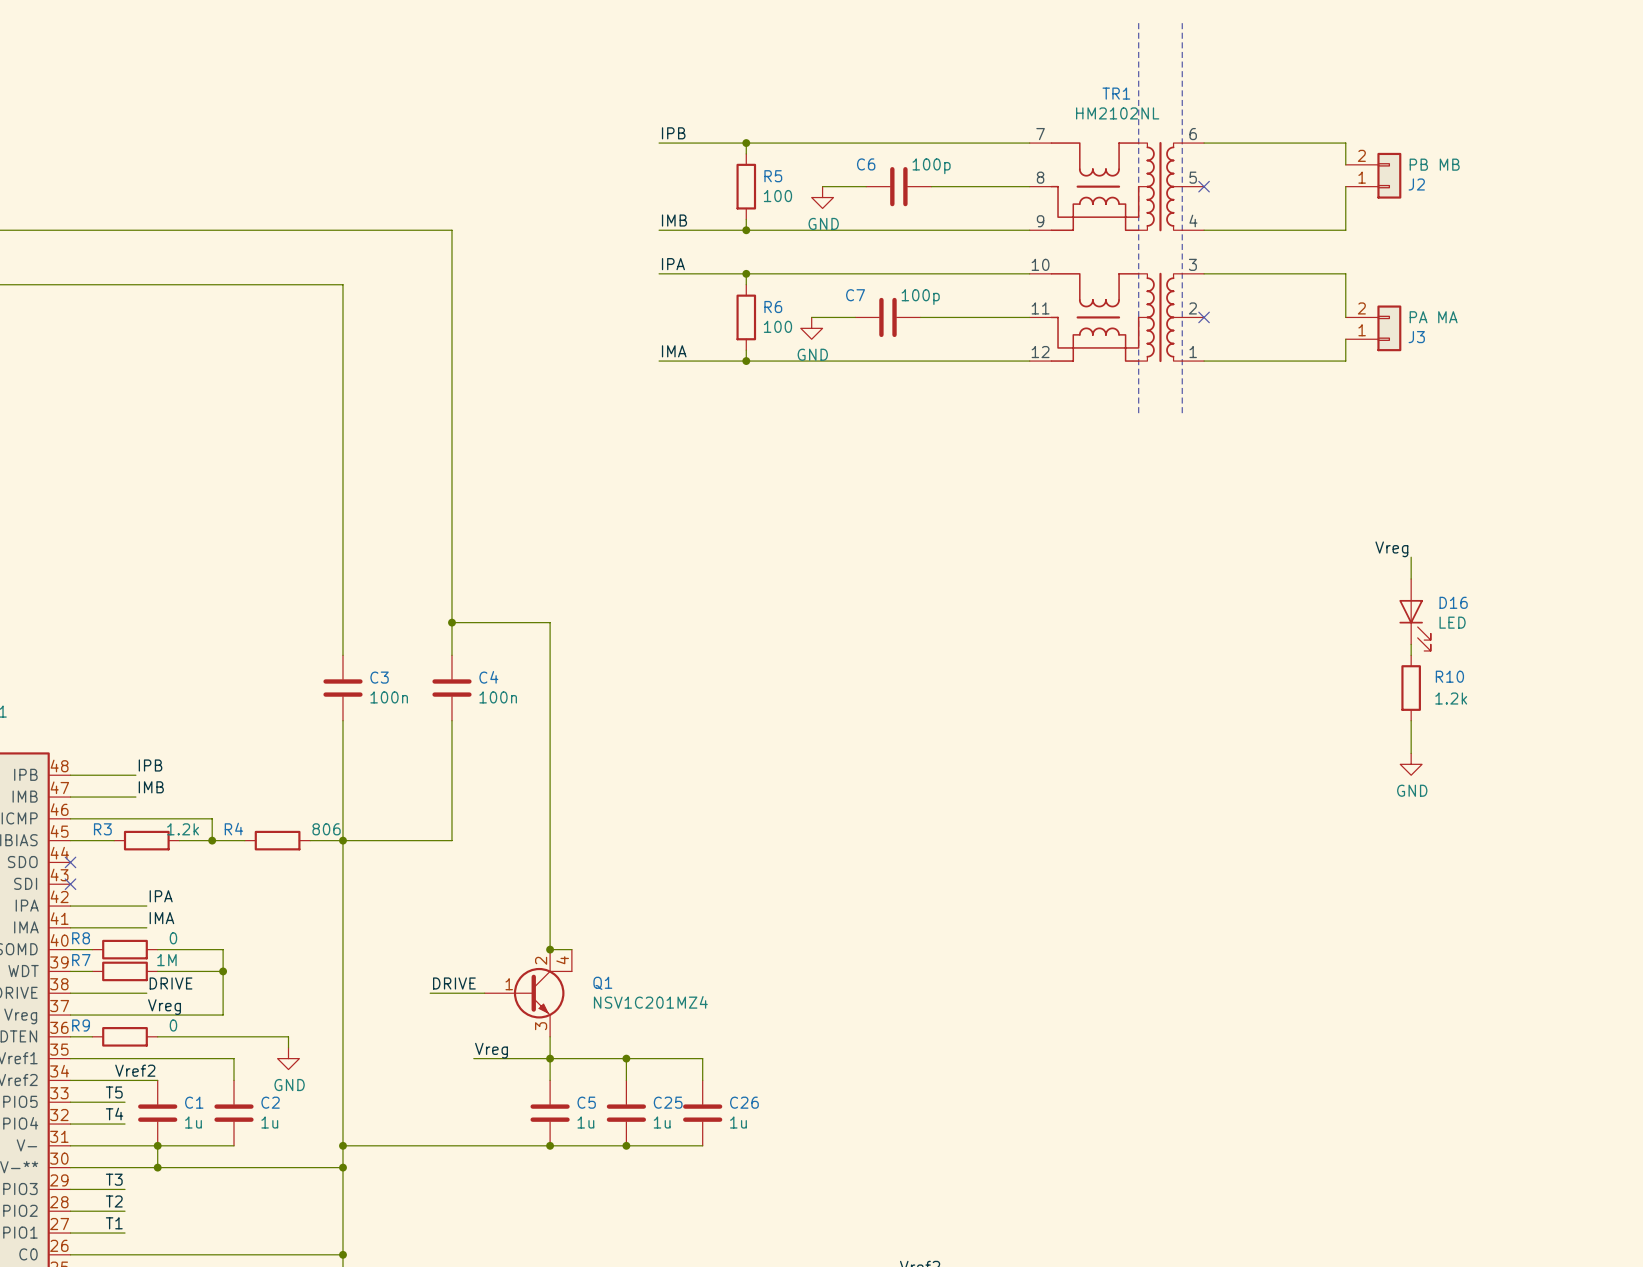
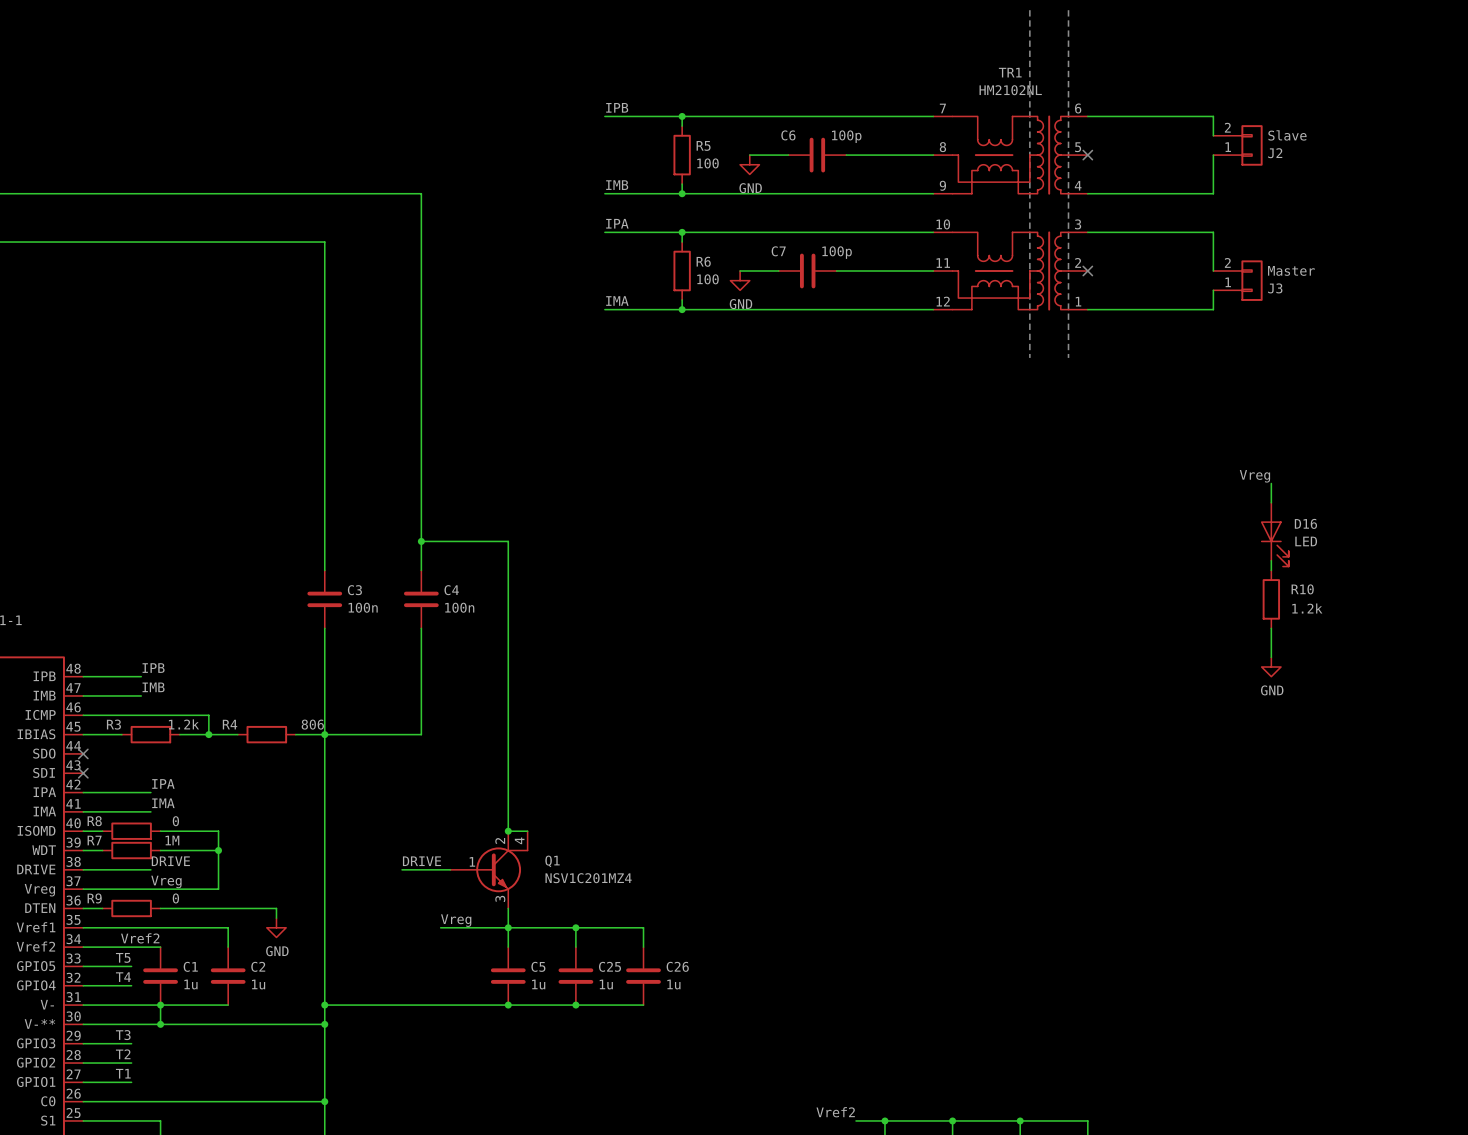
J2 value: PB MB (1434, 164) -> Slave (1287, 135)
J3 value: PA MA (1433, 317) -> Master (1291, 270)

